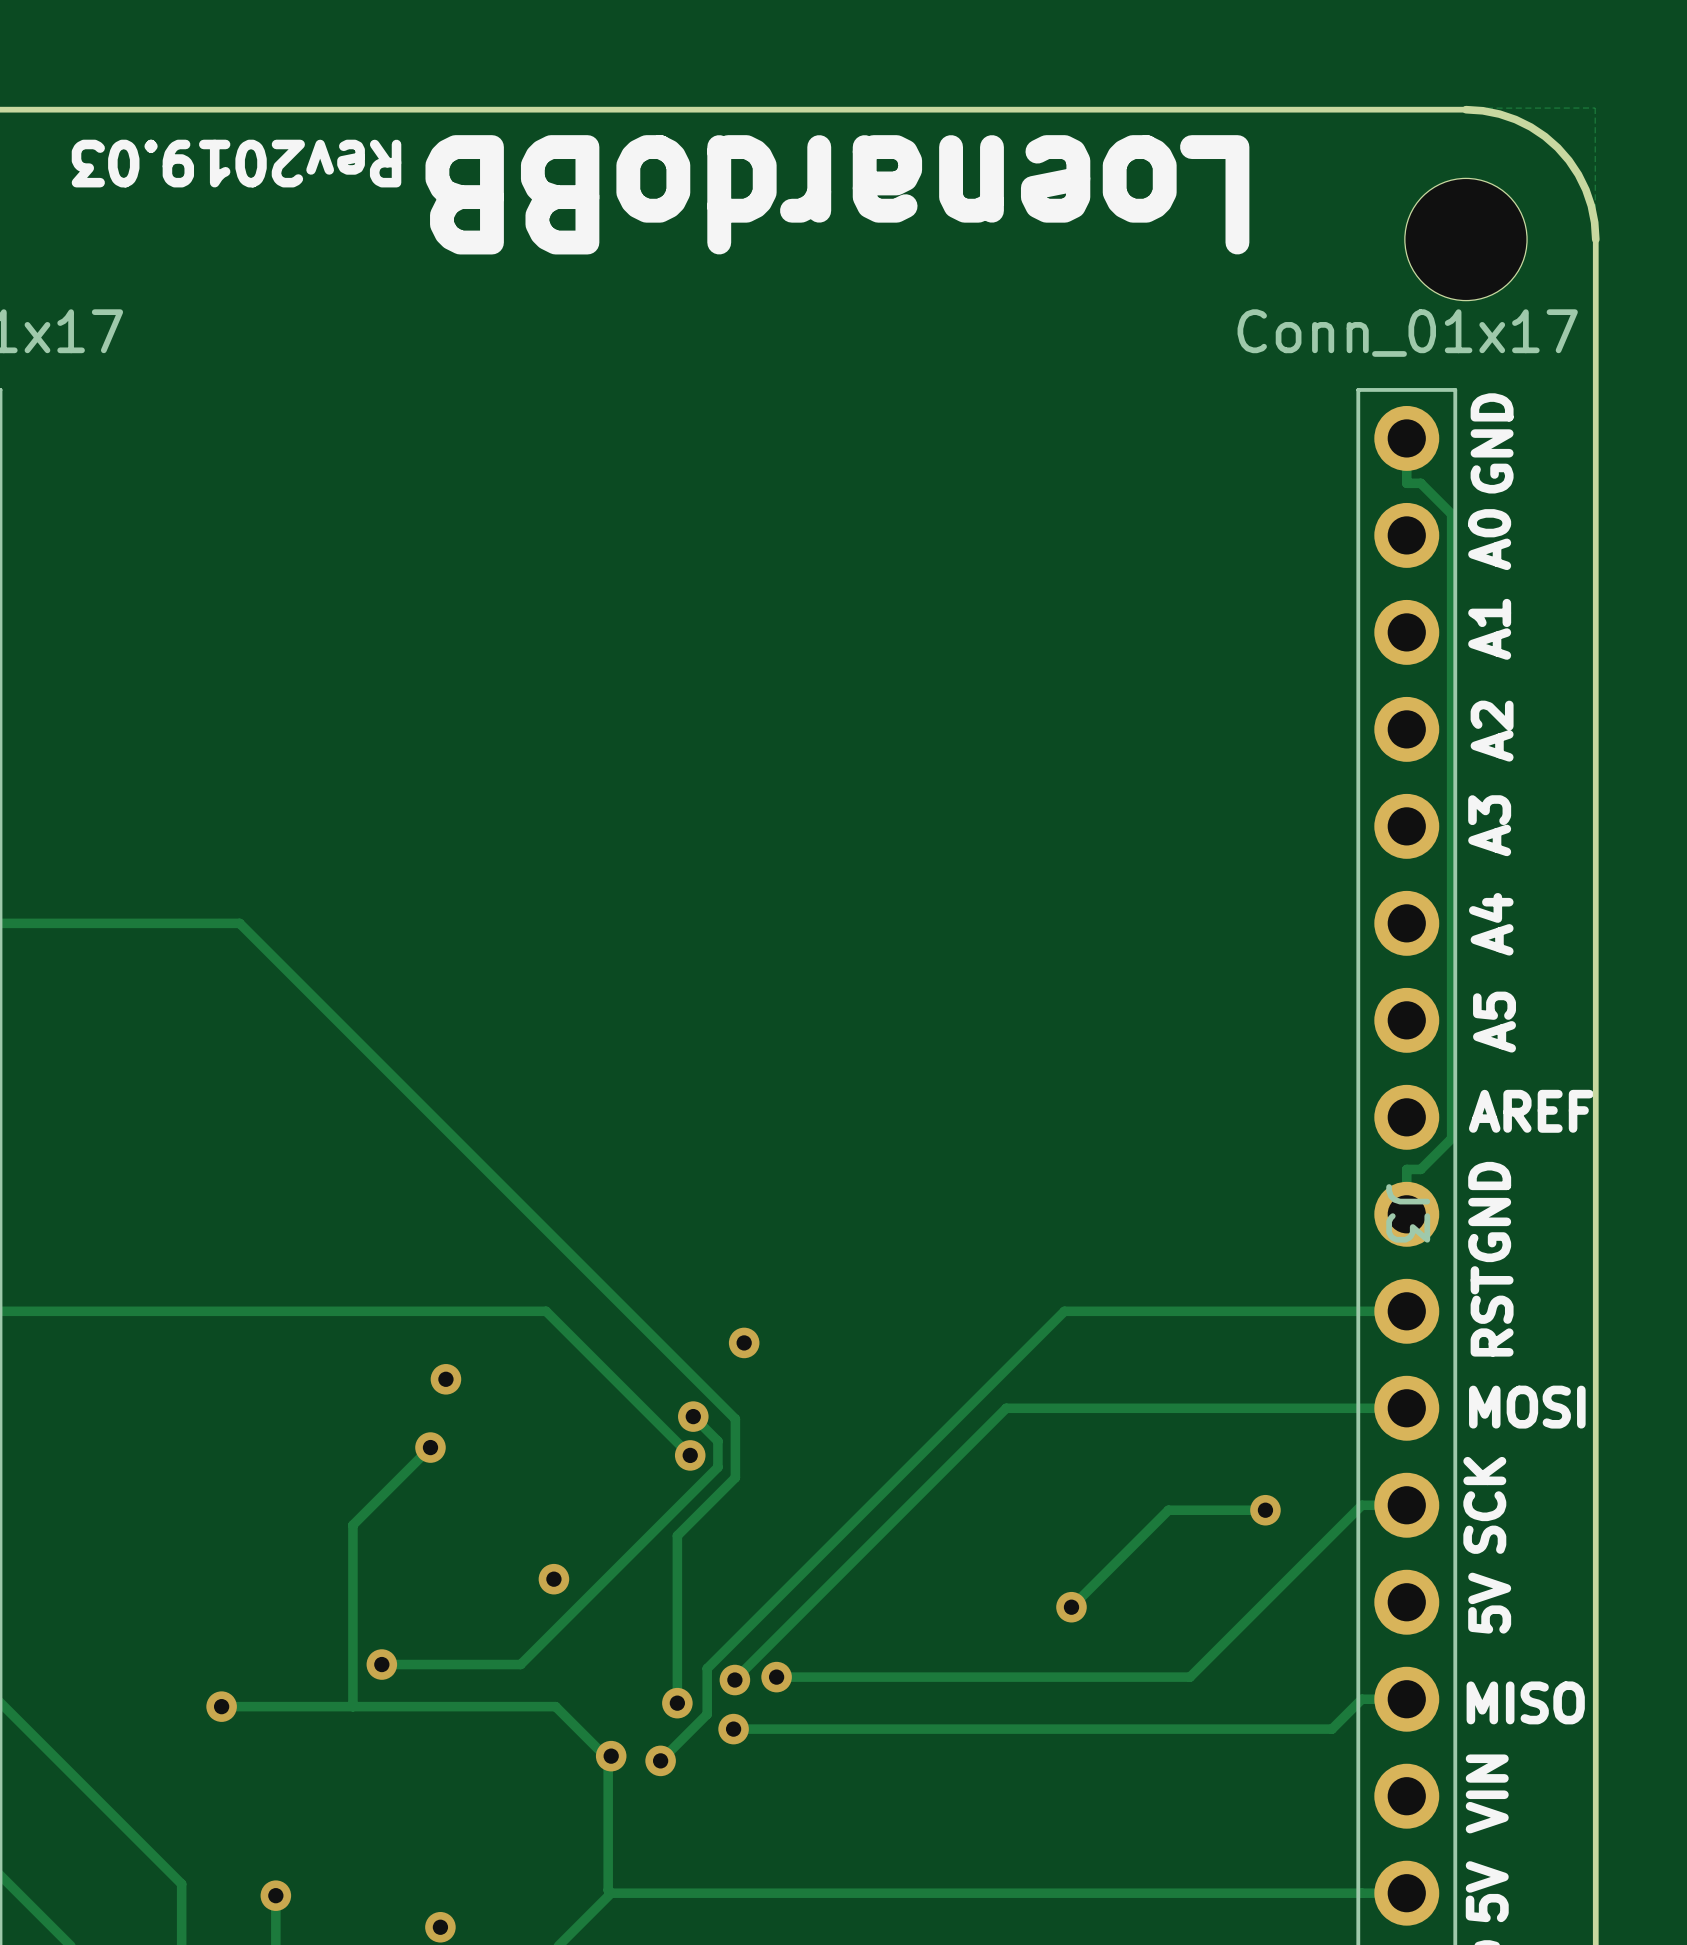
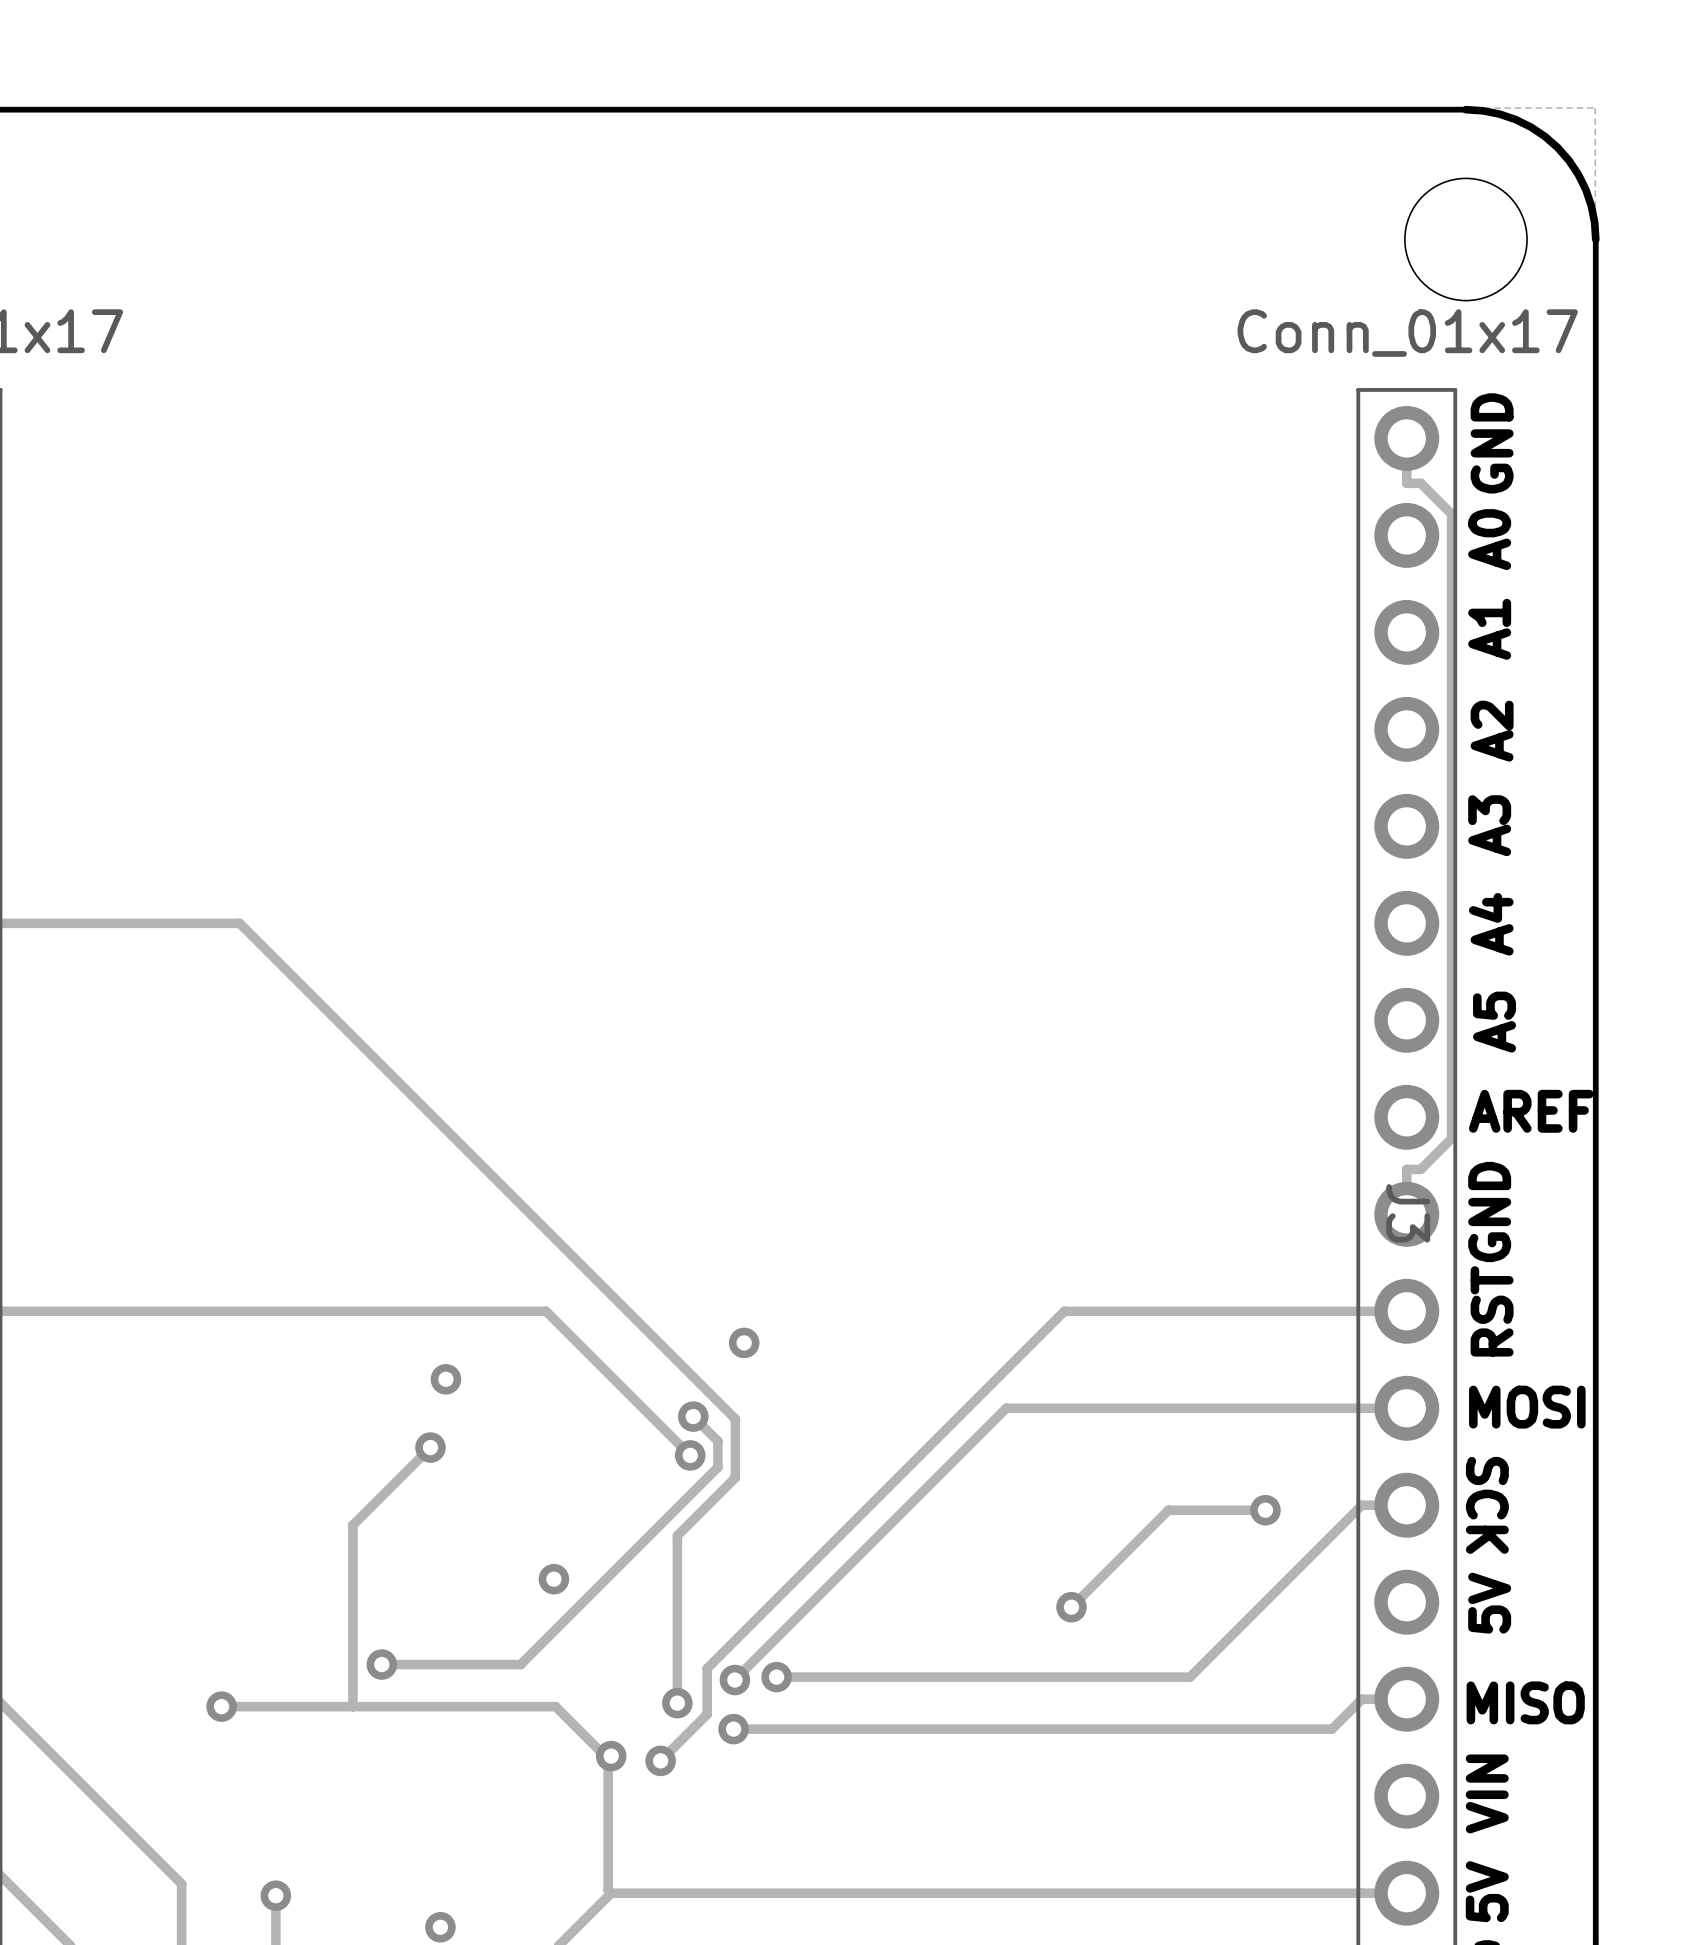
text: Rev2019.03 (236, 163) -> none
text: LoenardoBB (837, 194) -> none
text rotation: 0° (1484, 1505) -> 180° (1487, 1505)

